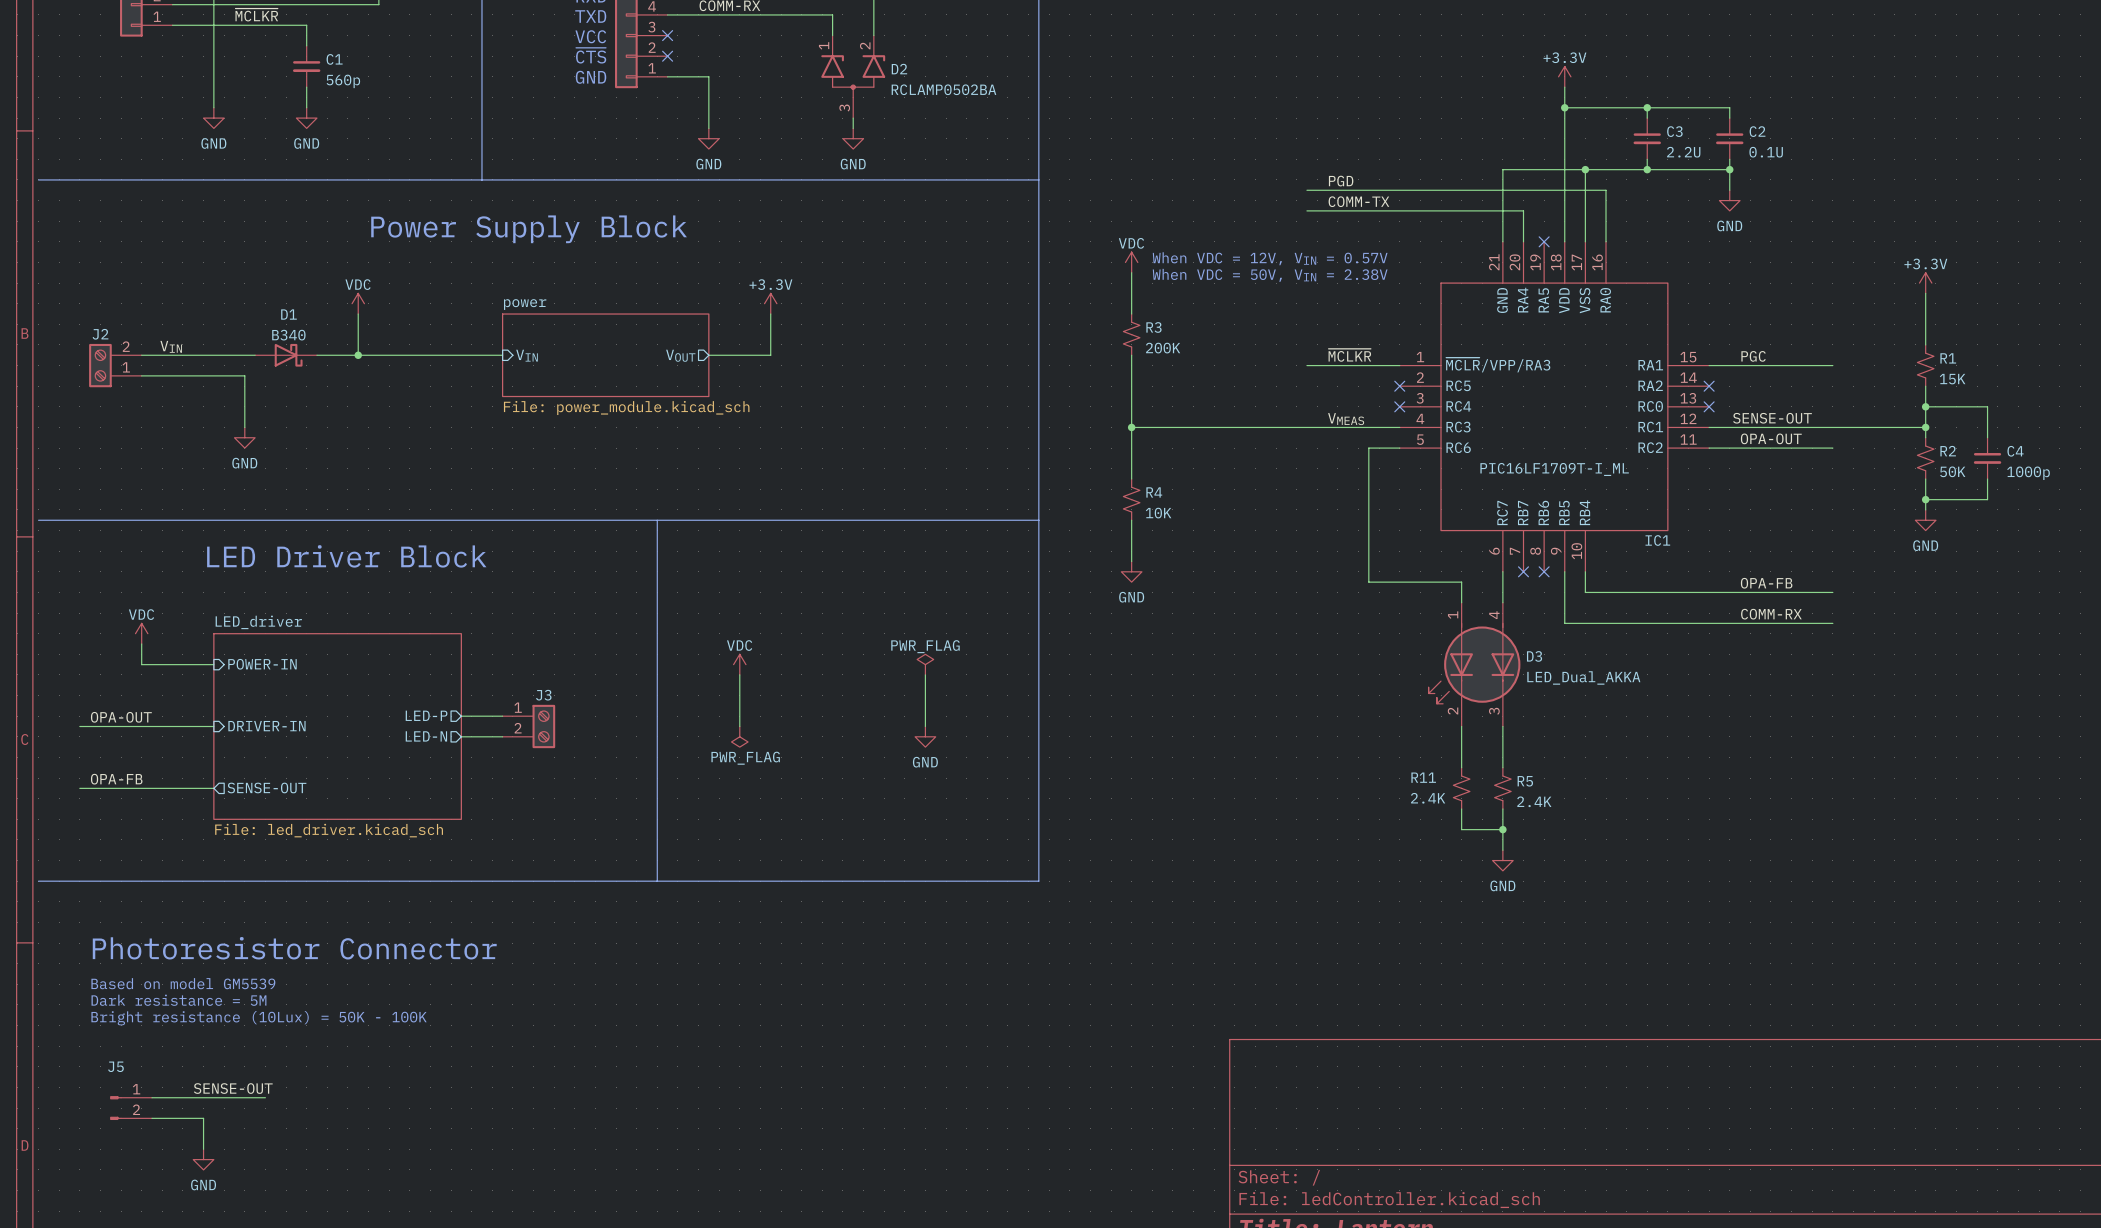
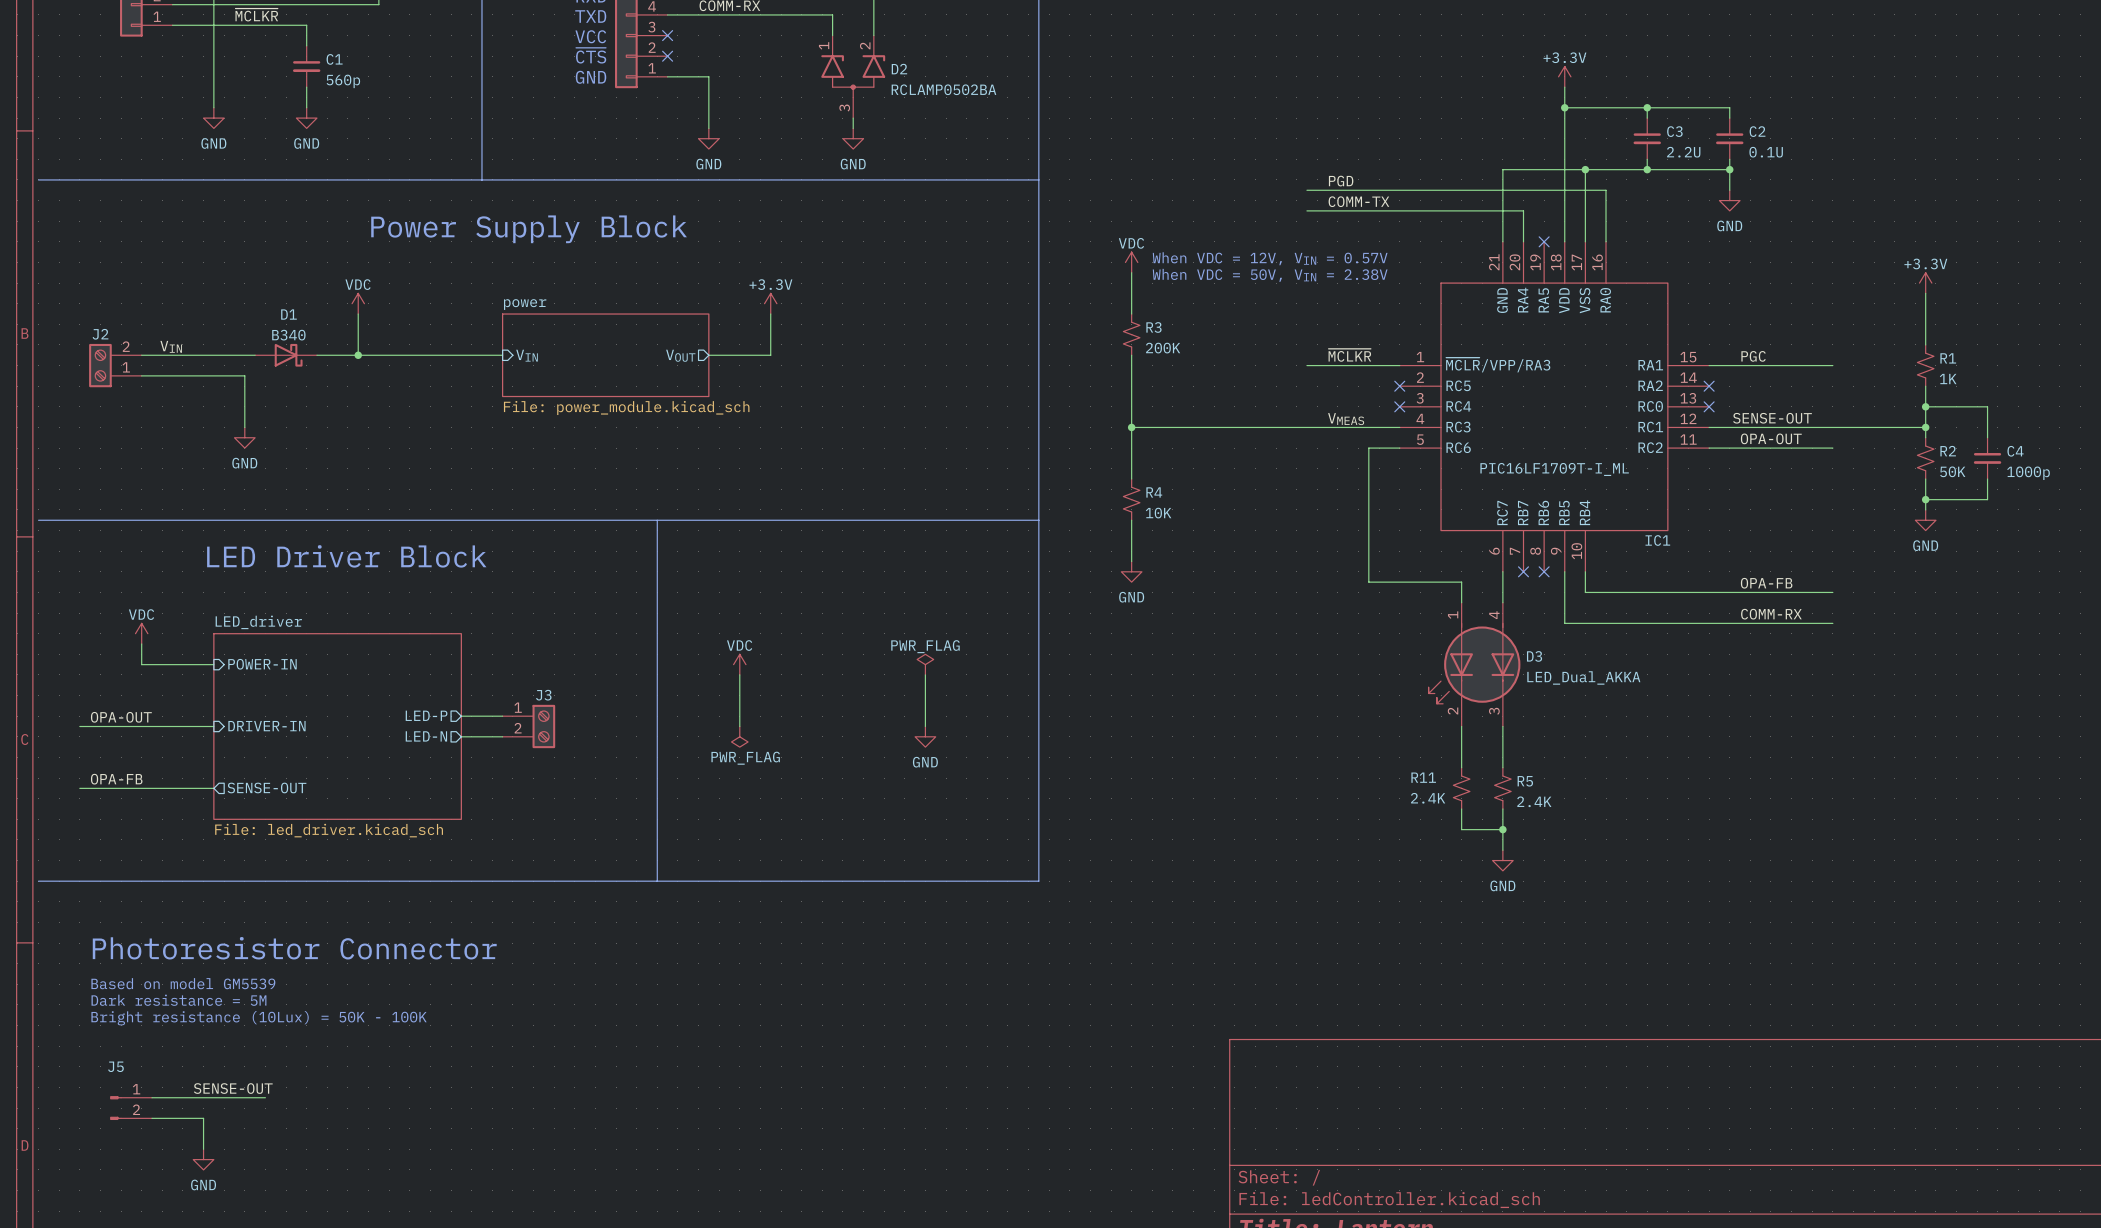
R1 value: 15K (1952, 379) -> 1K (1948, 379)

